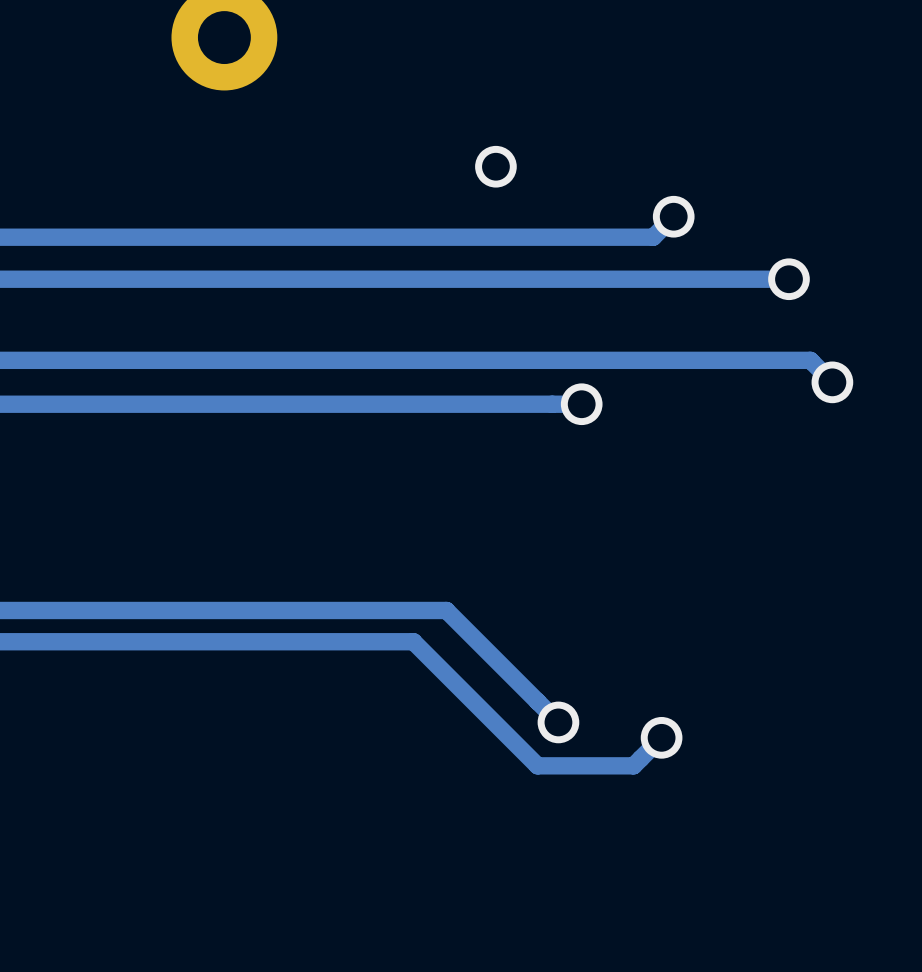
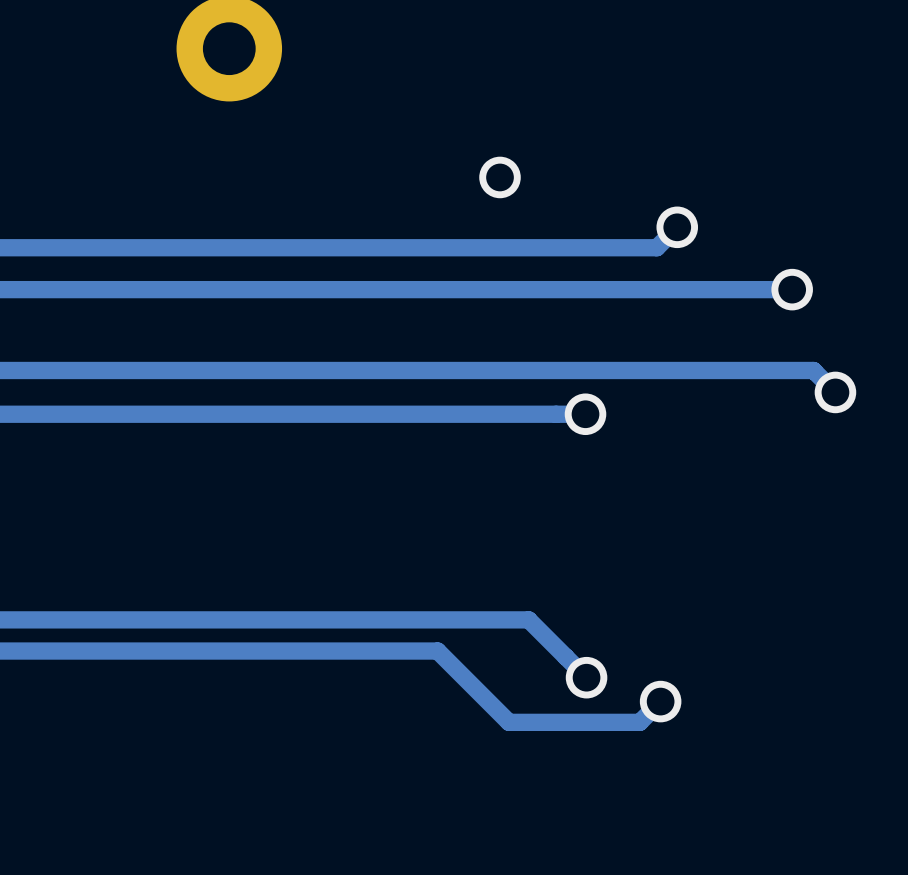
track: (446, 610) (558, 722) -> (450, 619) (528, 619) (586, 677)
track: (413, 641) (537, 765) (633, 765) (661, 737) -> (417, 651) (437, 651) (509, 722) (639, 722) (660, 701)
via: none -> (586, 677)
via: (558, 722) -> none
via position: (661, 737) -> (660, 701)

